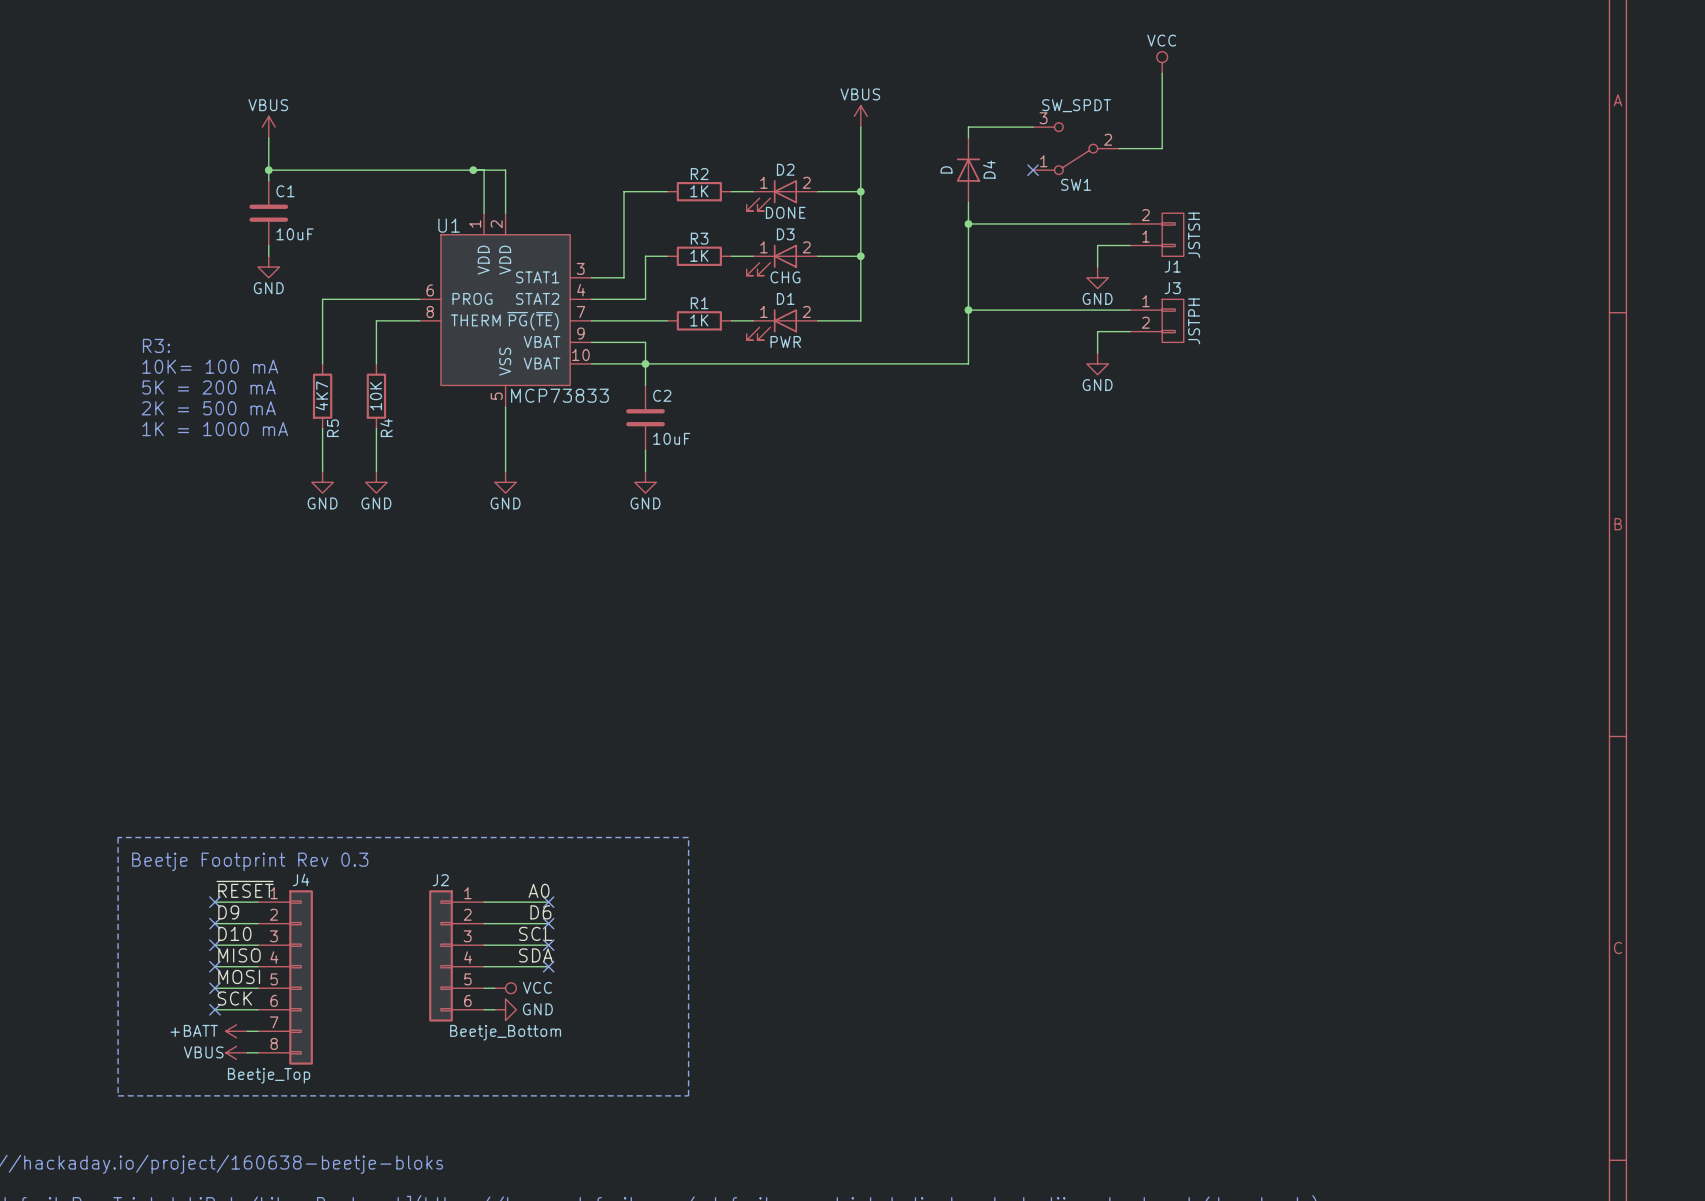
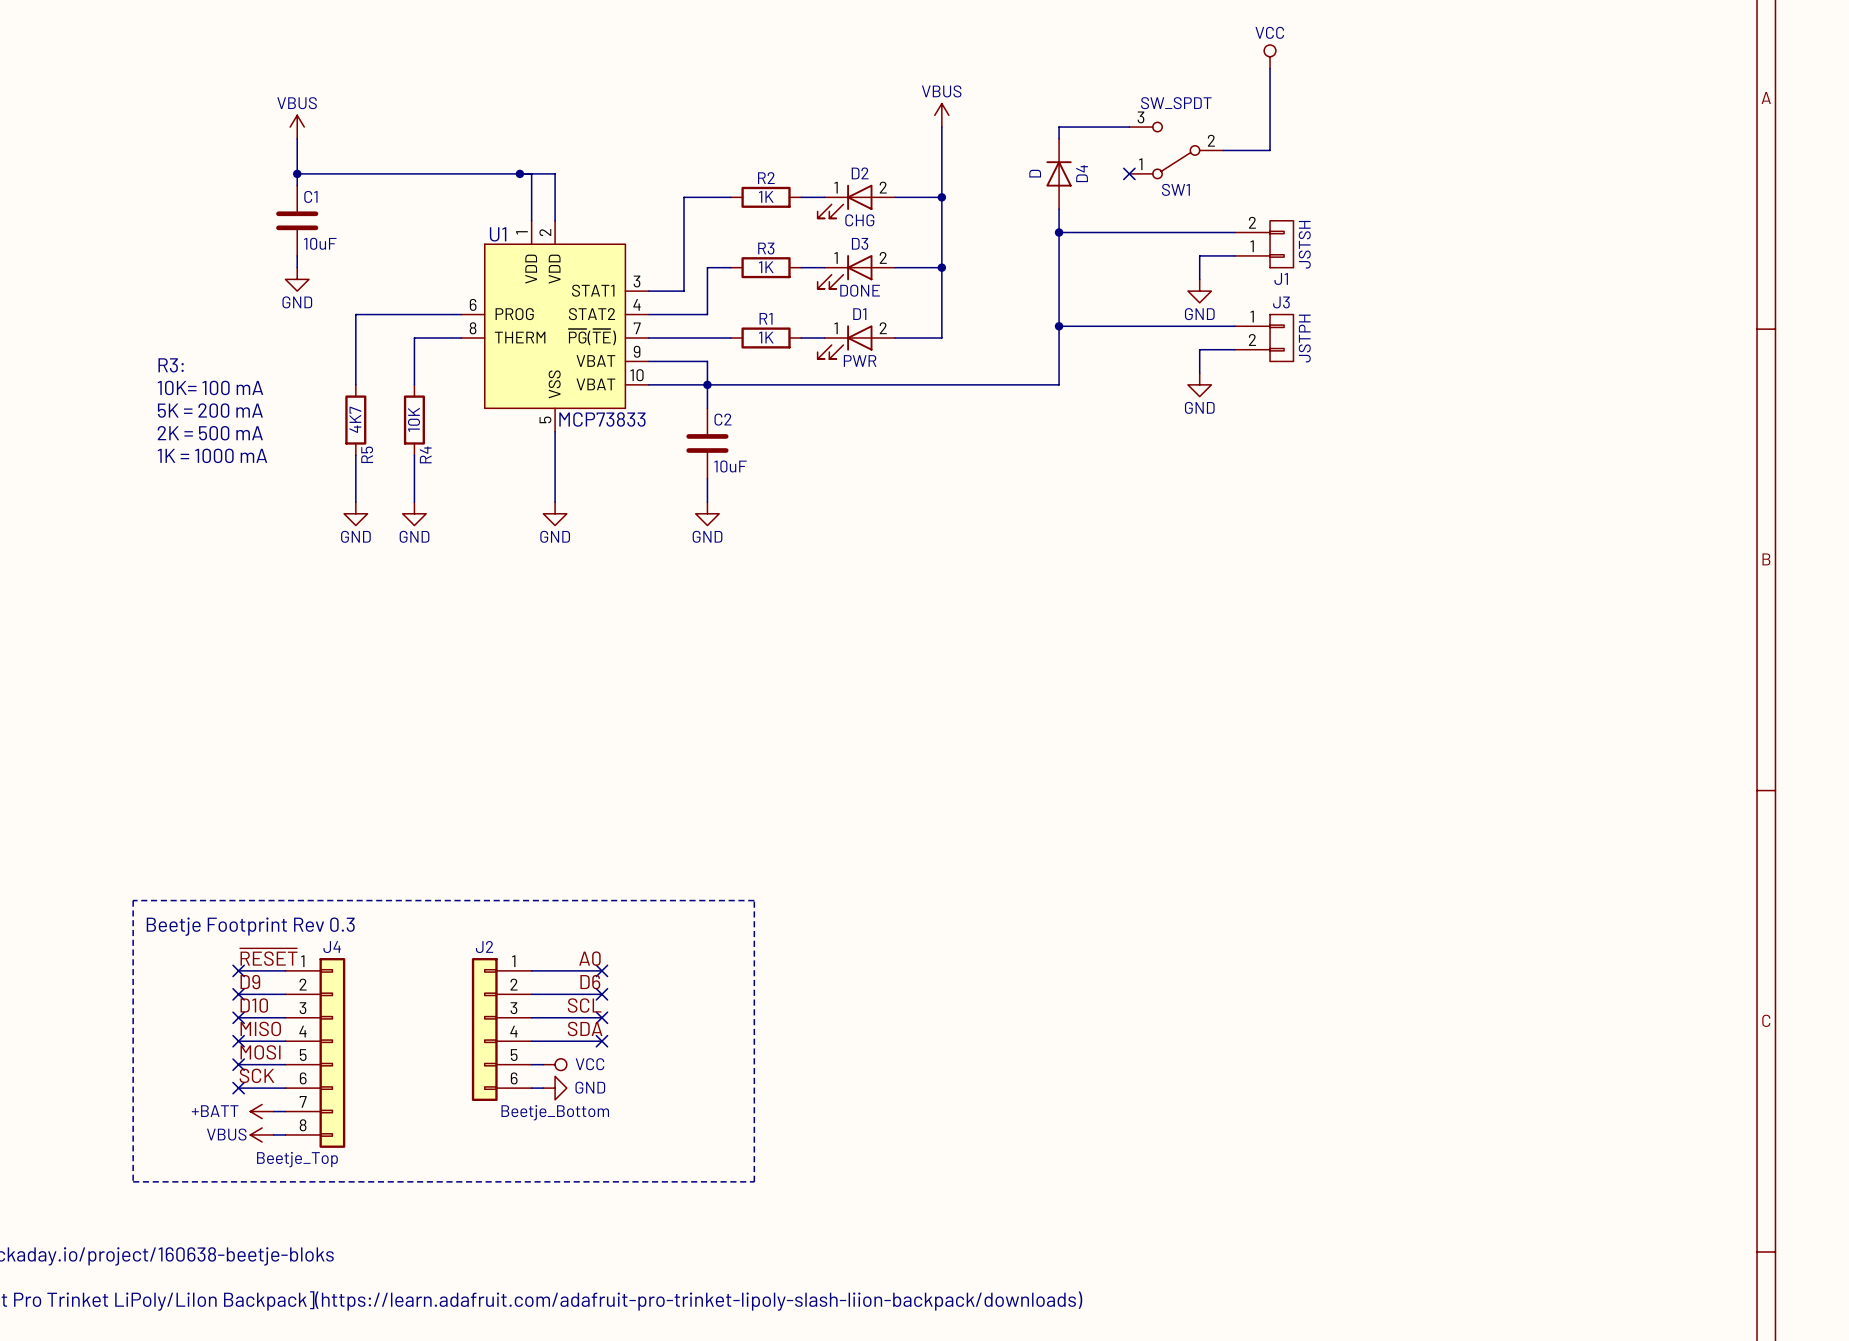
D2 value: DONE (785, 212) -> CHG (859, 220)
D3 value: CHG (785, 277) -> DONE (860, 290)

